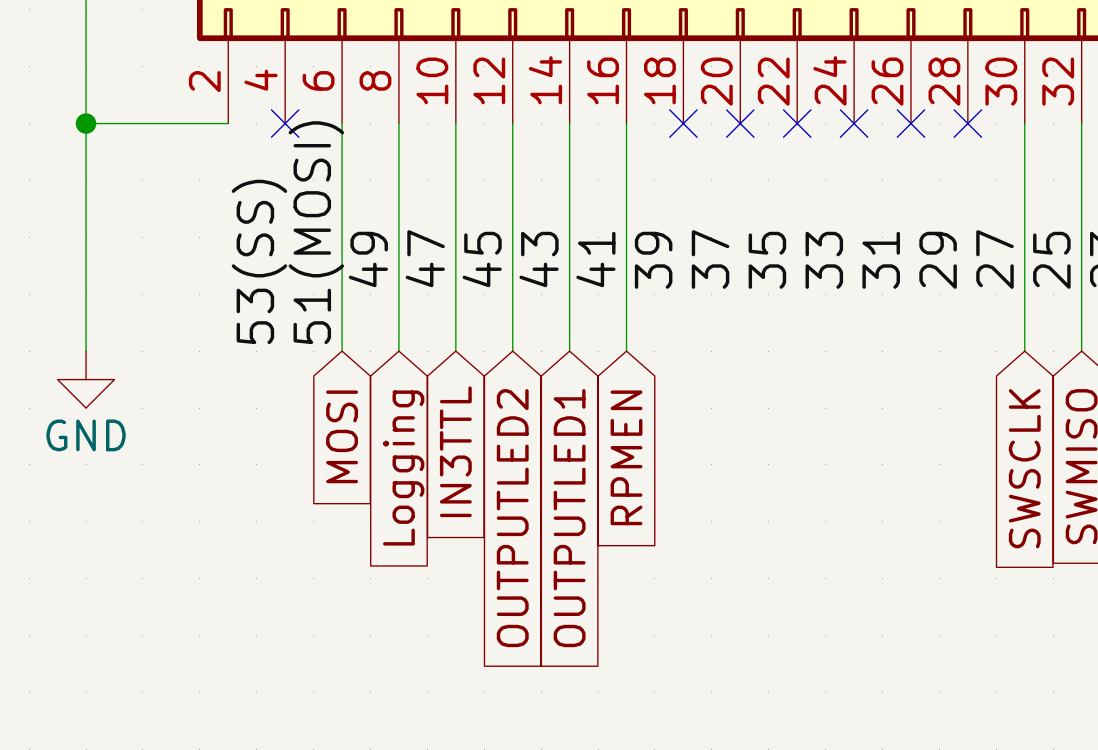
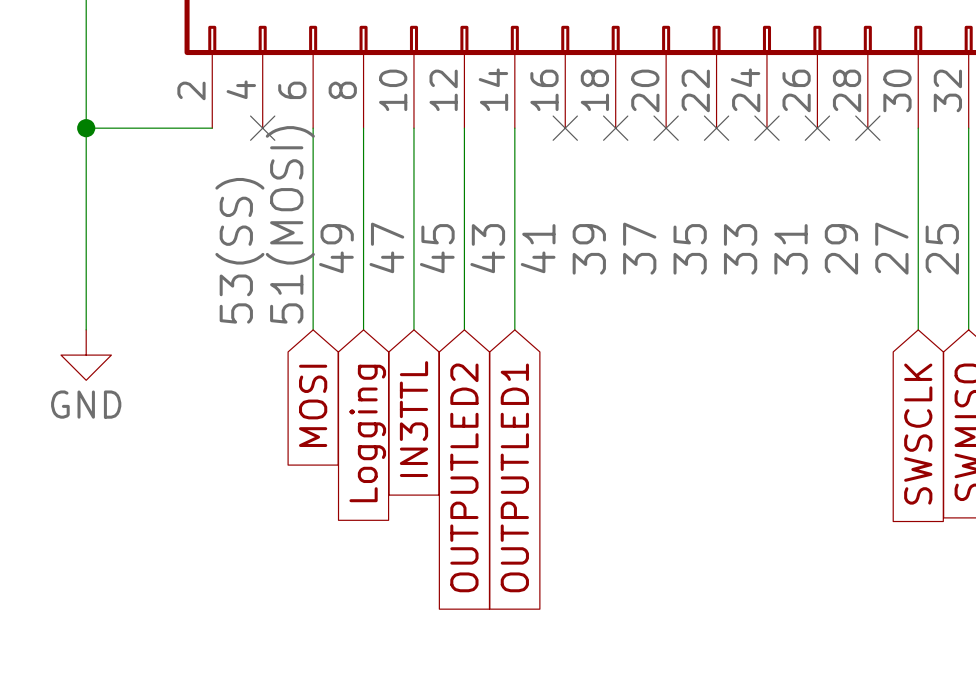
wire: (626, 123) (626, 351) -> none
no-connect mark: none -> (565, 128)
global label: RPMEN (626, 457) -> none

